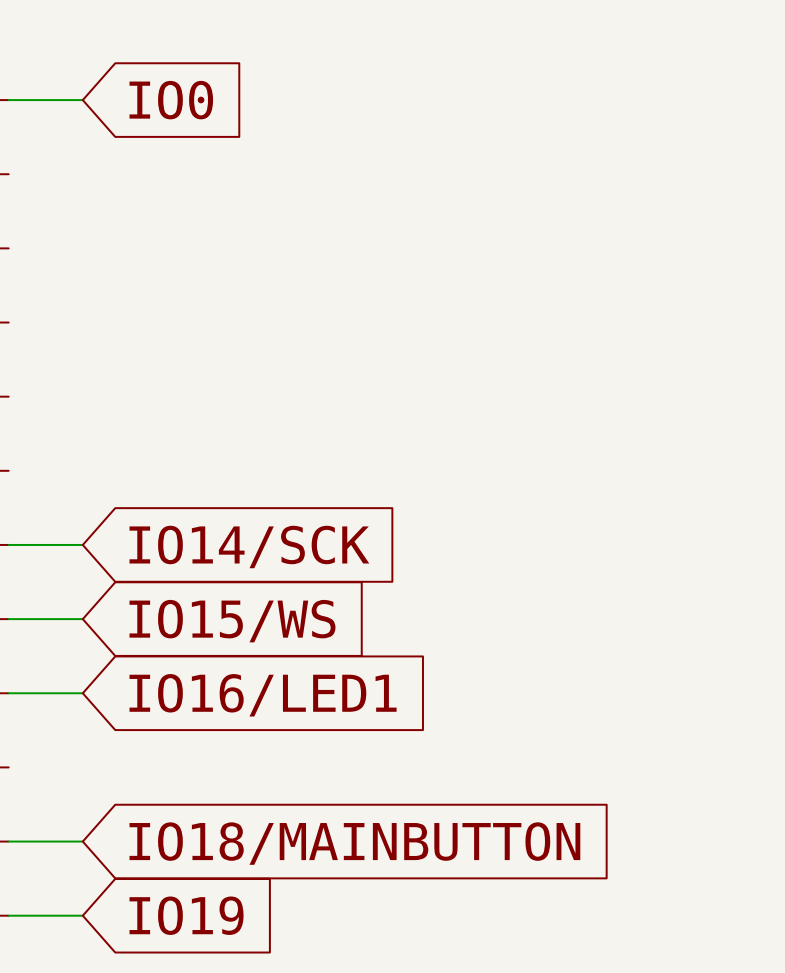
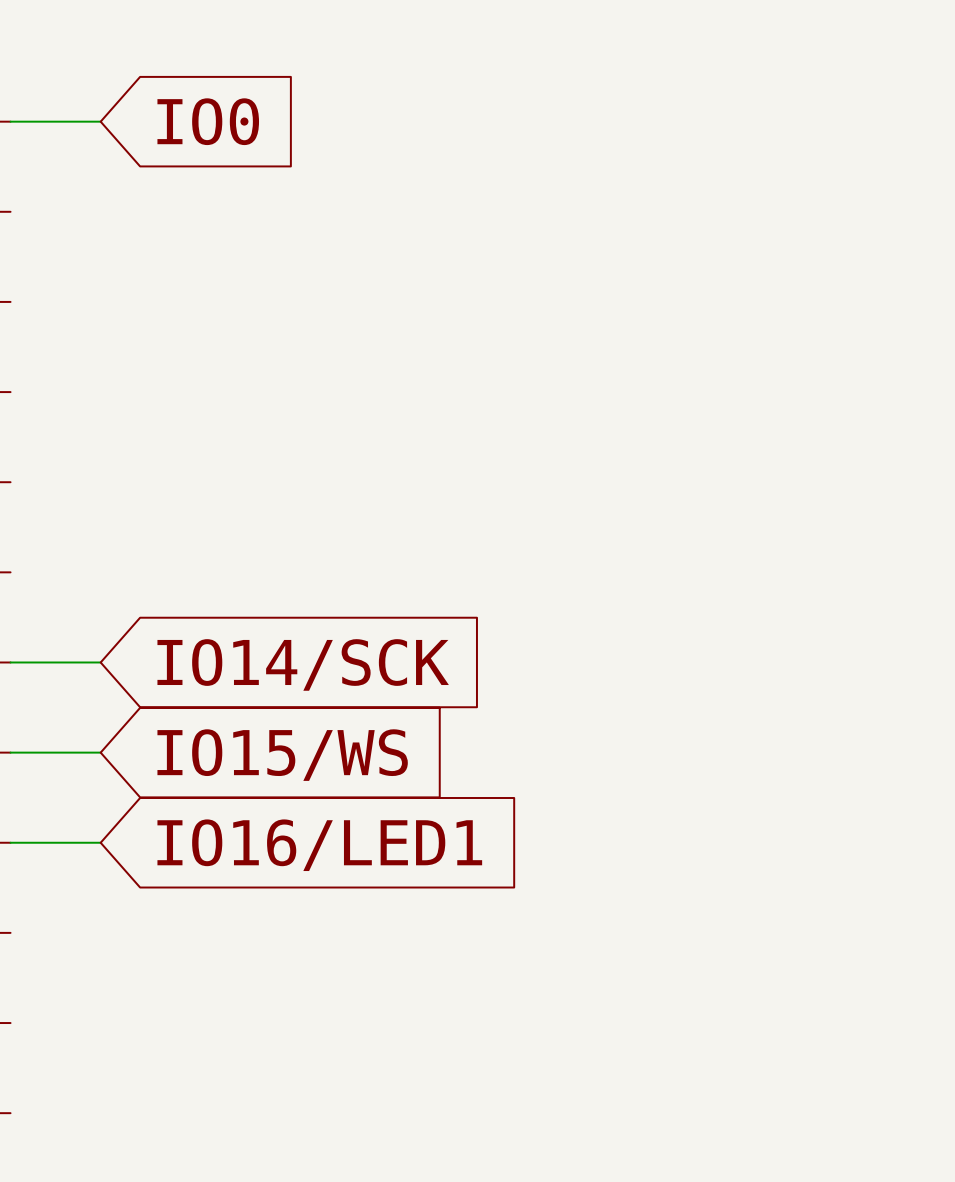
wire: (8, 841) (82, 841) -> none
global label: IO18/MAINBUTTON (354, 843) -> none
wire: (8, 915) (82, 915) -> none
global label: IO19 (186, 915) -> none

